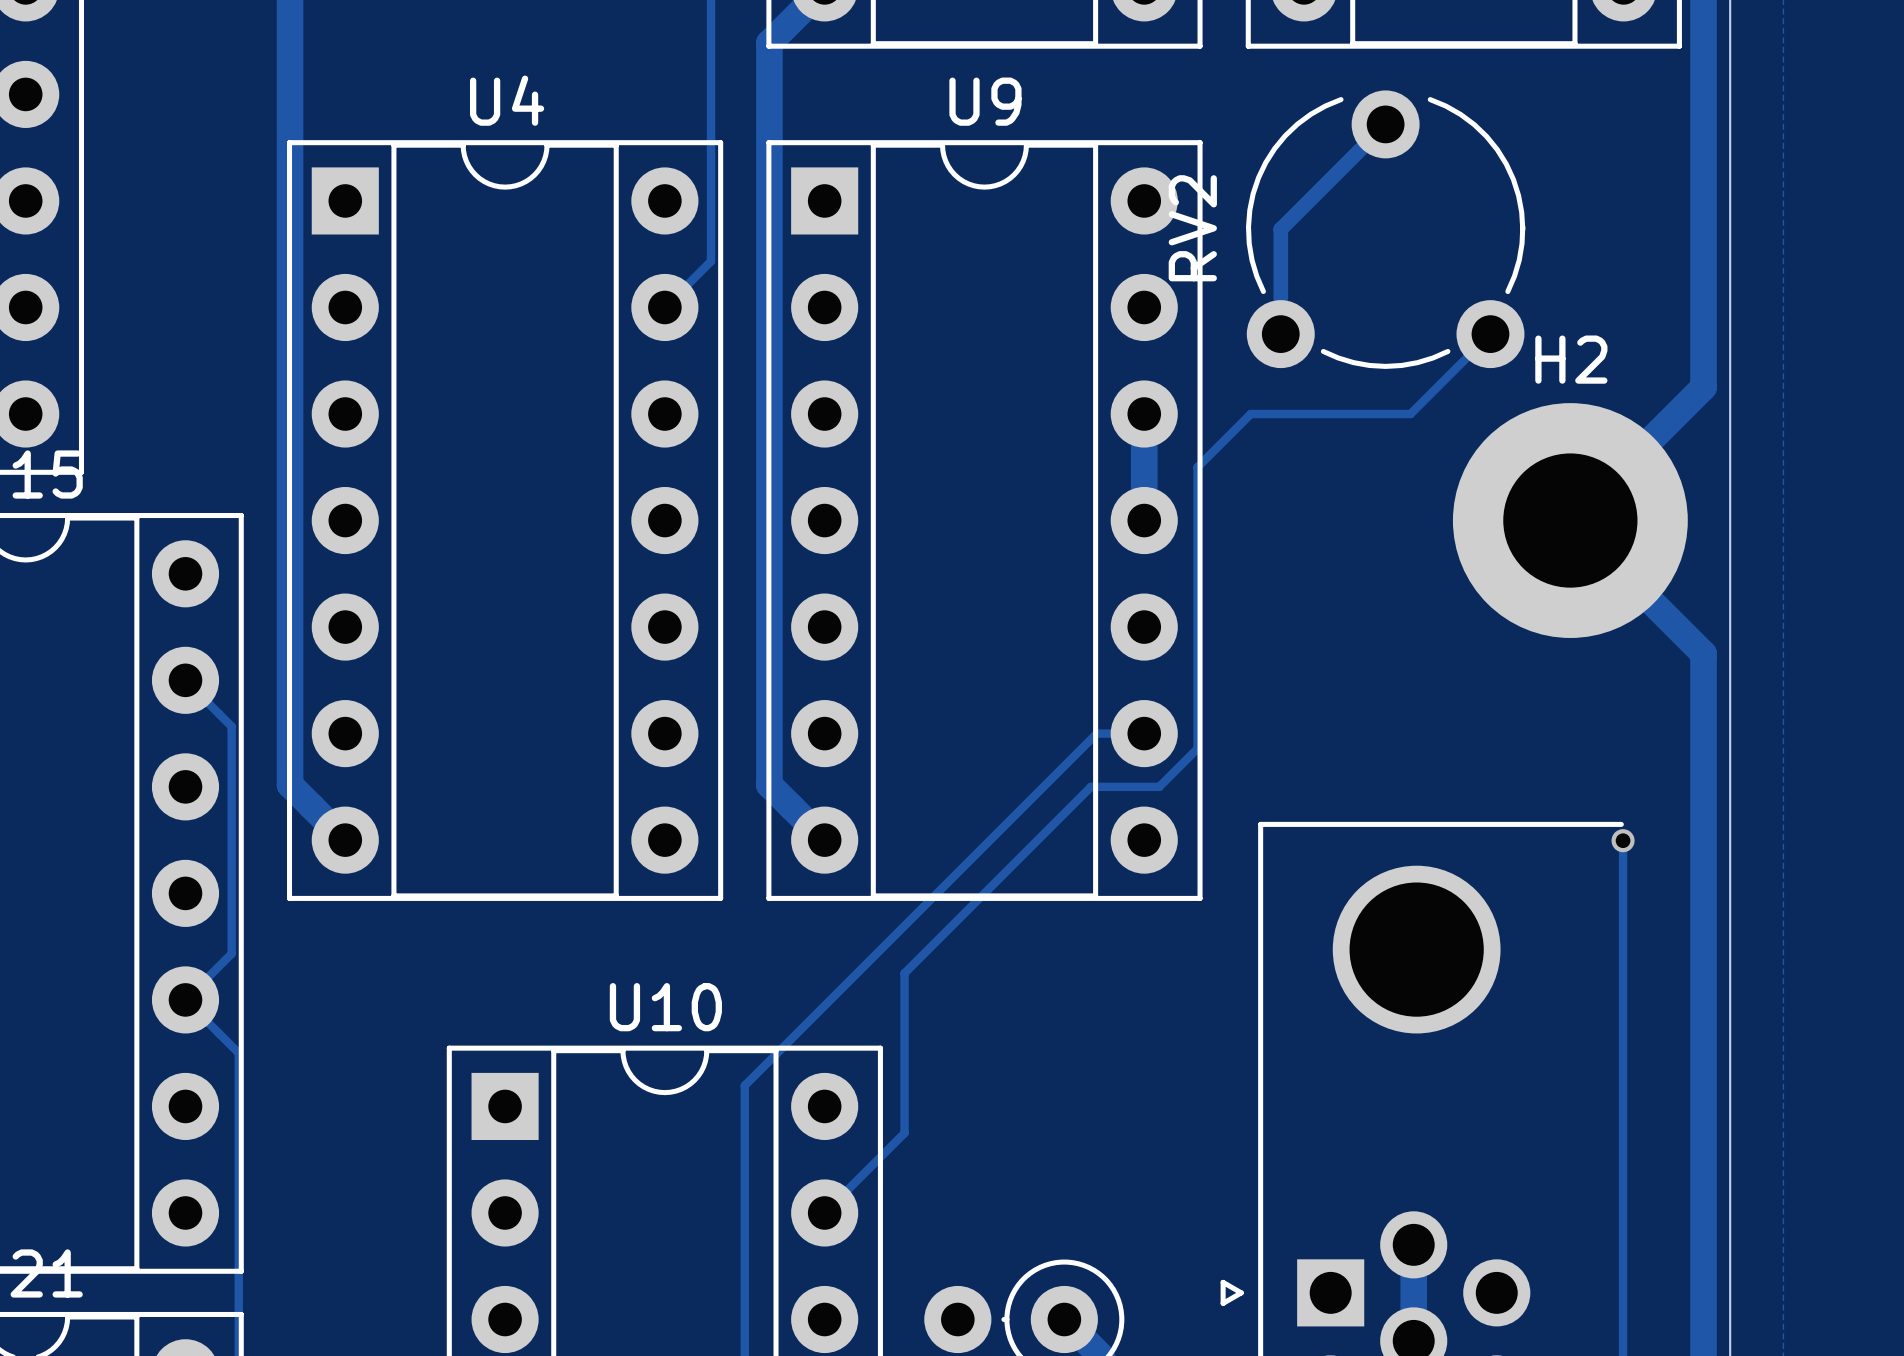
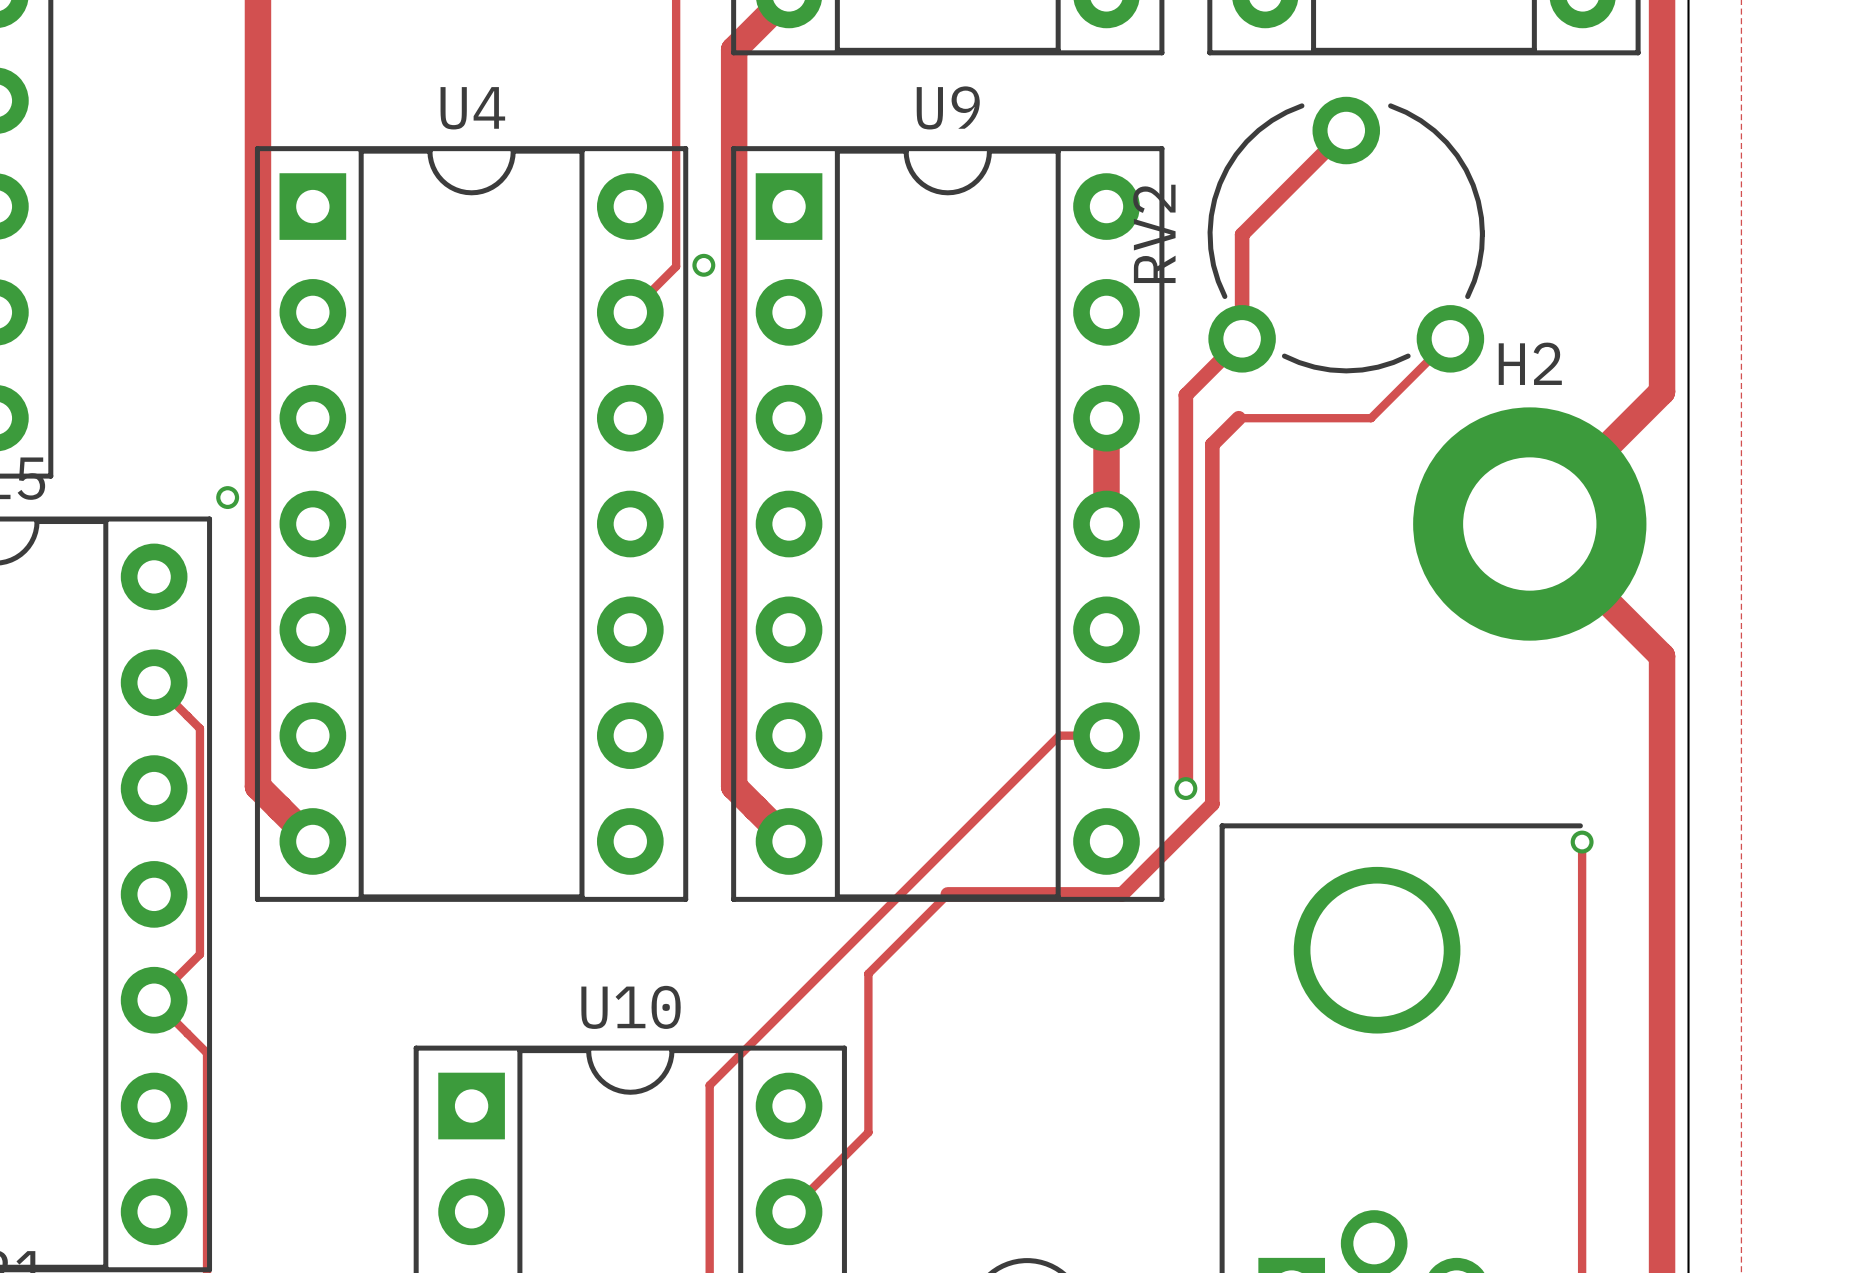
via: none -> (703, 265)
track: none -> (1242, 338) (1185, 395) (1185, 788)
track: (1277, 414) (1250, 414) (1197, 467) (1197, 748) (1159, 786) (1090, 786) (984, 893) -> (1238, 418) (1212, 444) (1212, 804) (1122, 894) (947, 894)
via: none -> (227, 497)
via: none -> (1185, 788)

